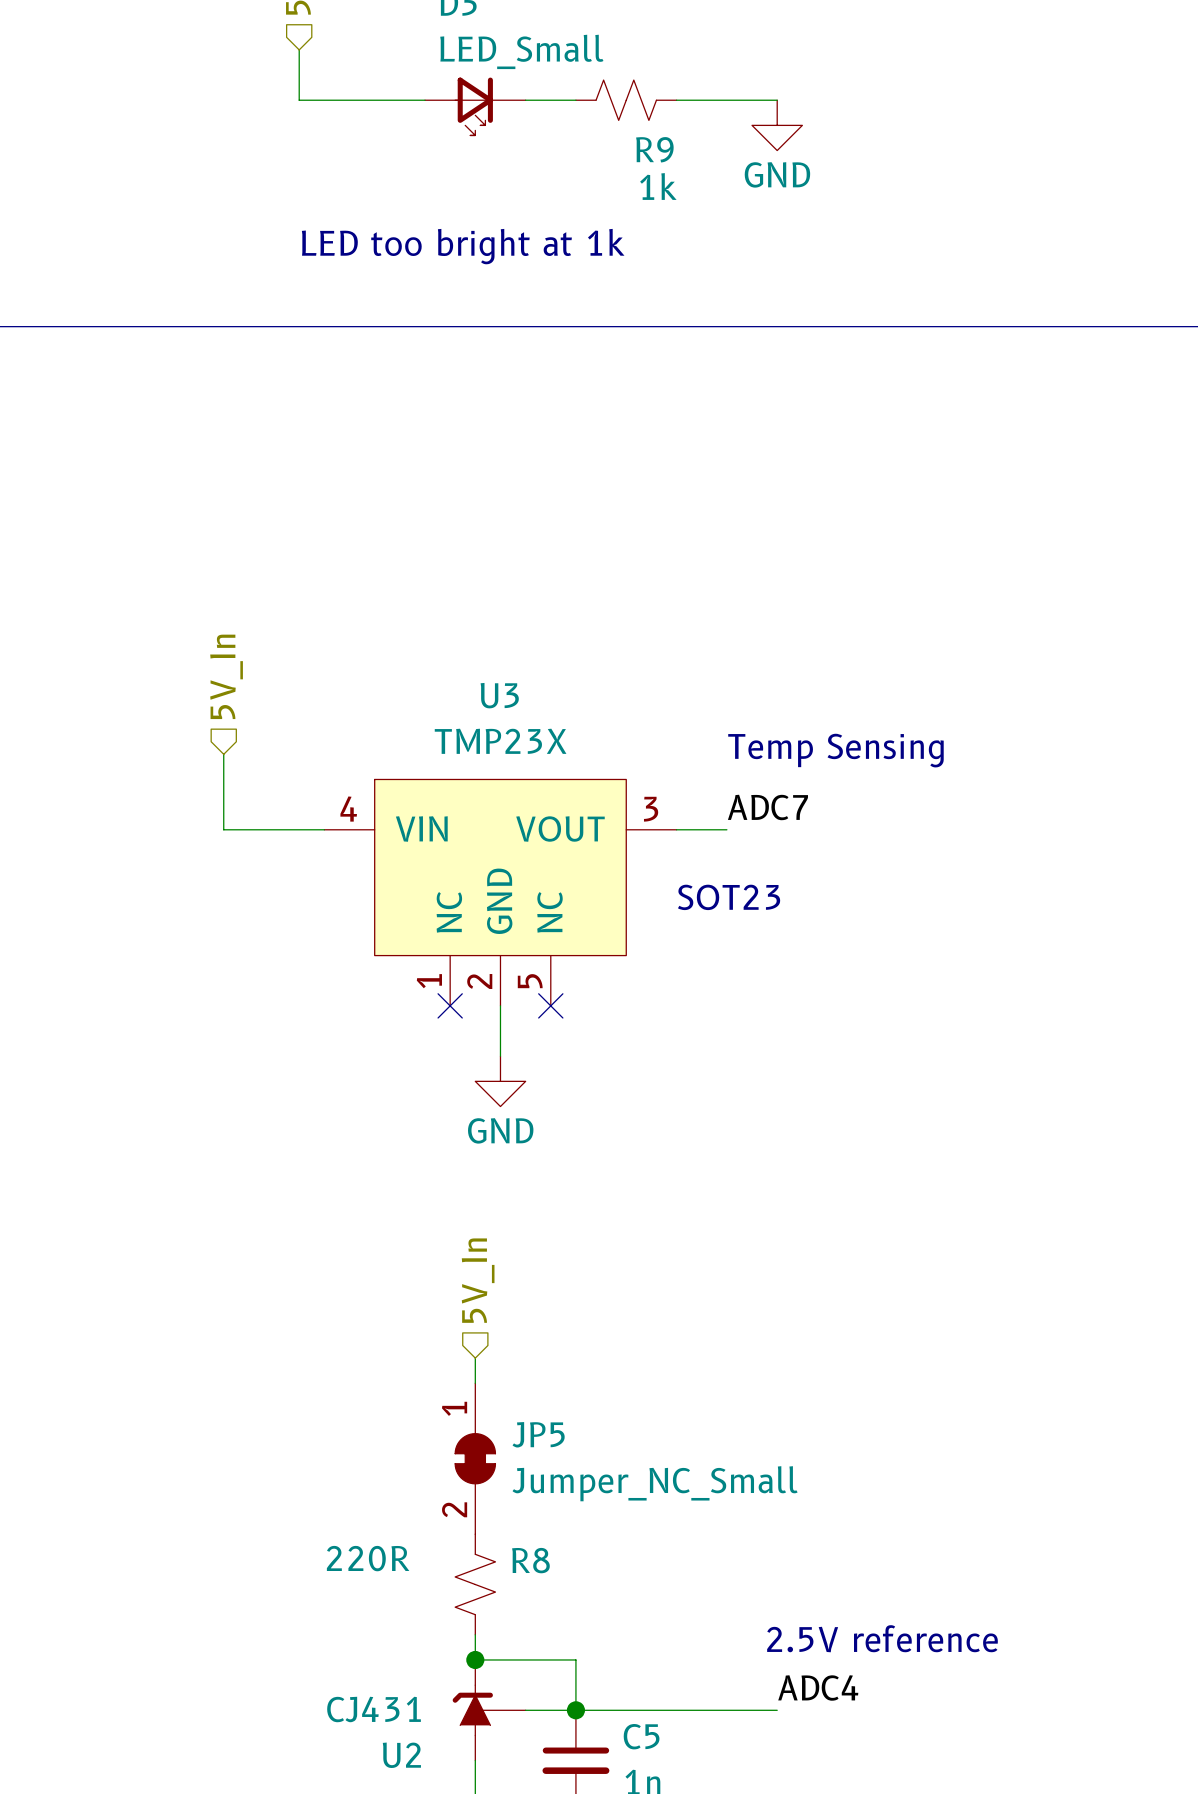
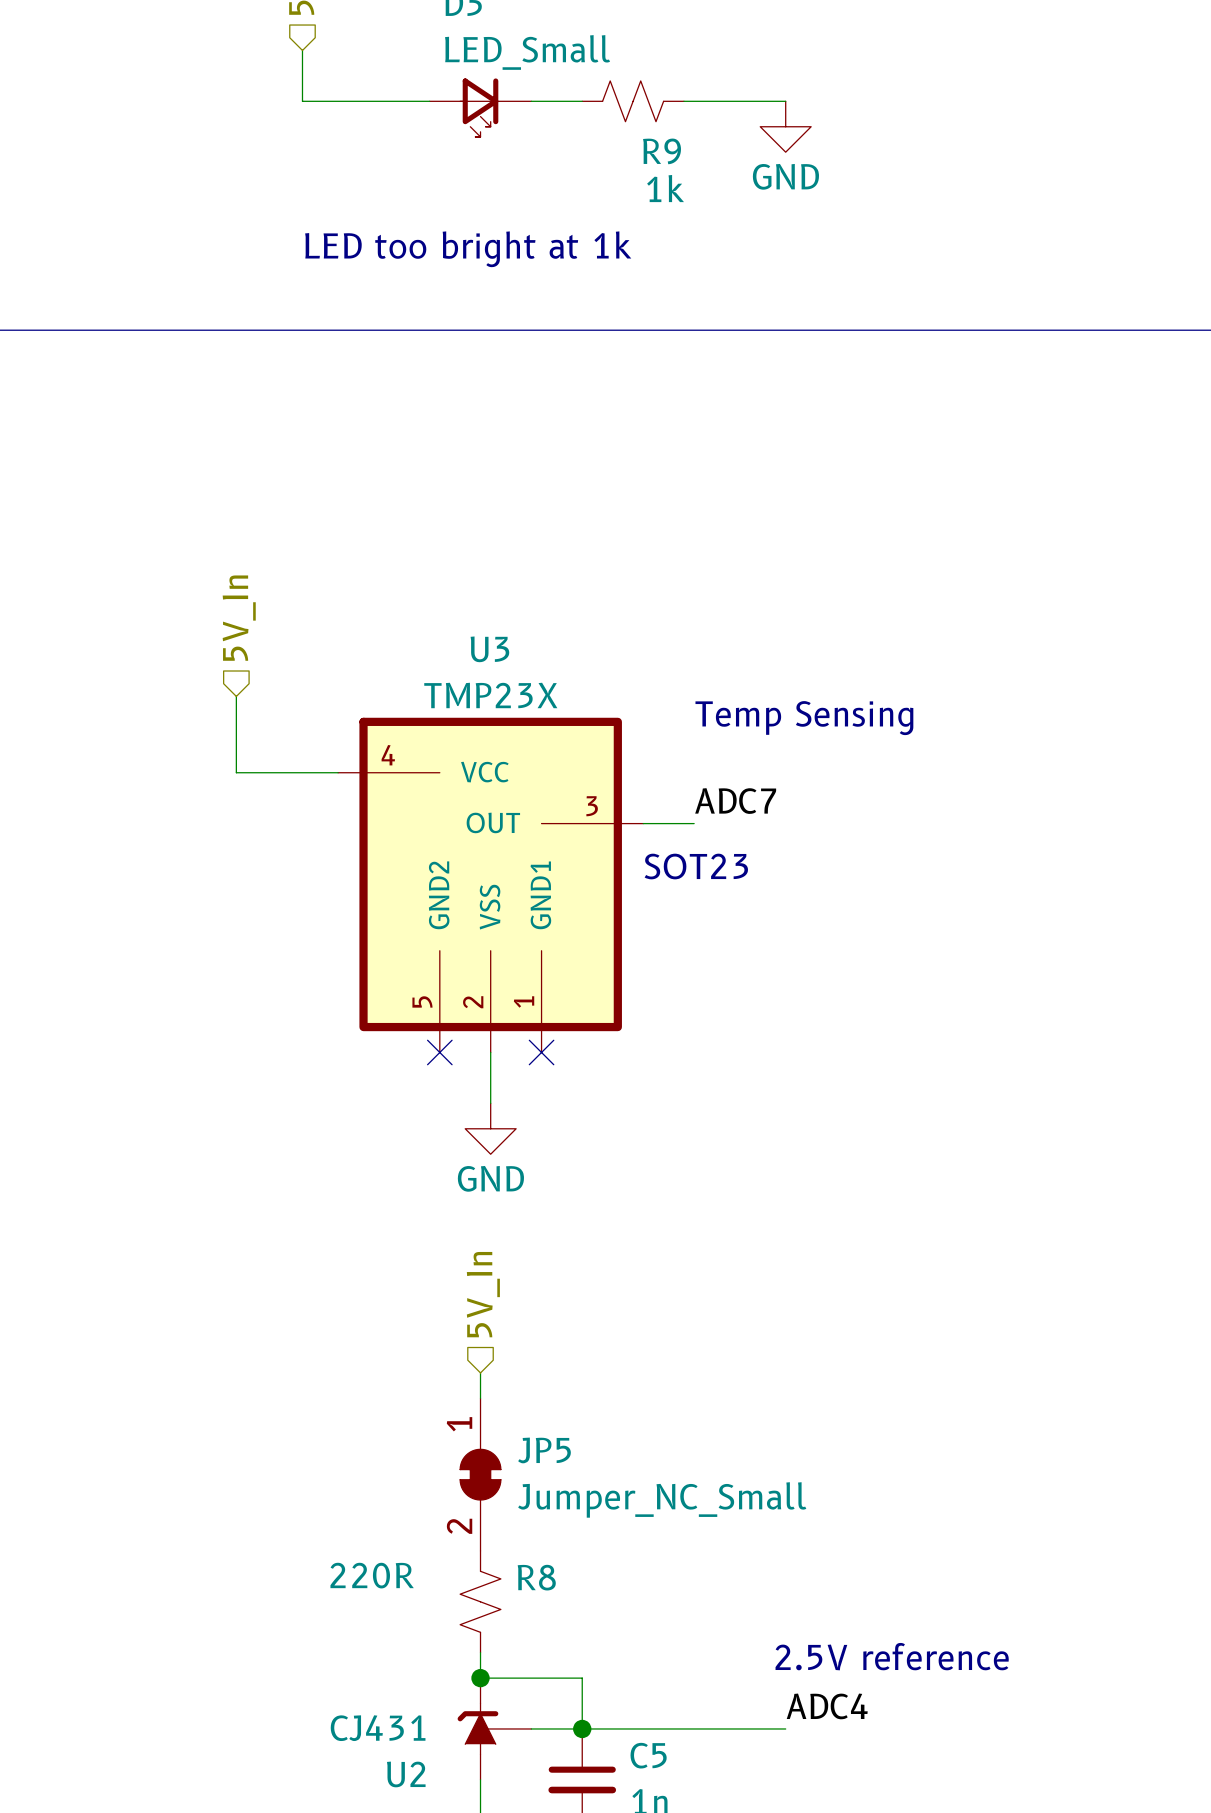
hierarchical label position: 5V_In (226, 676) -> 5V_In (239, 618)
text position: Temp Sensing (835, 750) -> Temp Sensing (804, 718)
wire: (223, 754) (223, 829) (324, 829) -> (236, 696) (236, 772) (338, 772)
U3 symbol: [324, 779, 677, 1006] -> [338, 717, 644, 1053]
label position: ADC7 (767, 807) -> ADC7 (735, 801)
wire: (676, 829) (726, 829) -> (643, 823) (694, 823)
text position: SOT23 (729, 897) -> SOT23 (696, 866)
no-connect mark position: (450, 1005) -> (439, 1052)
wire: (500, 1005) (500, 1056) -> (490, 1052) (490, 1103)
no-connect mark position: (550, 1005) -> (541, 1052)
power symbol position: GND (500, 1081) -> GND (490, 1128)

